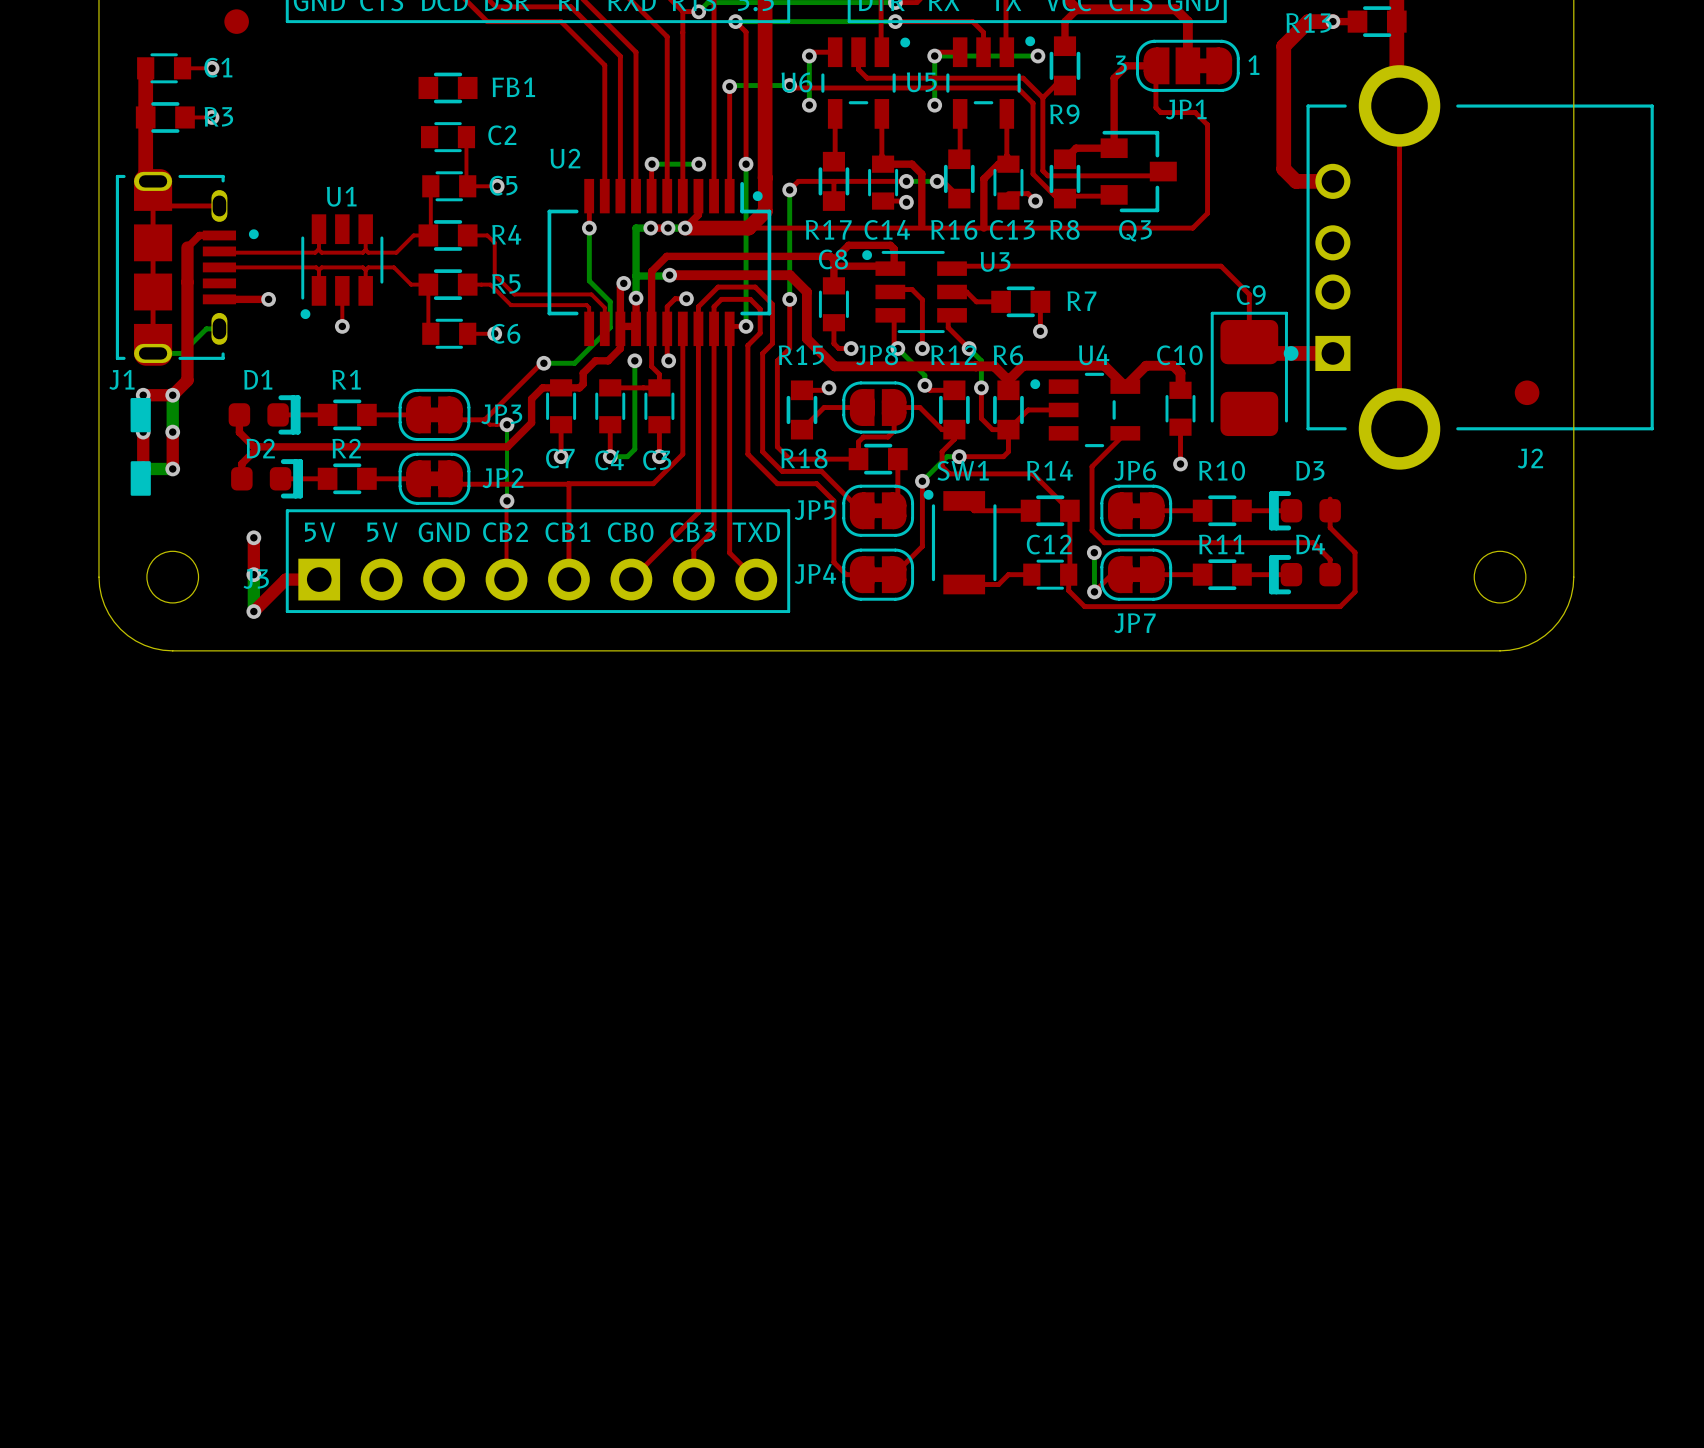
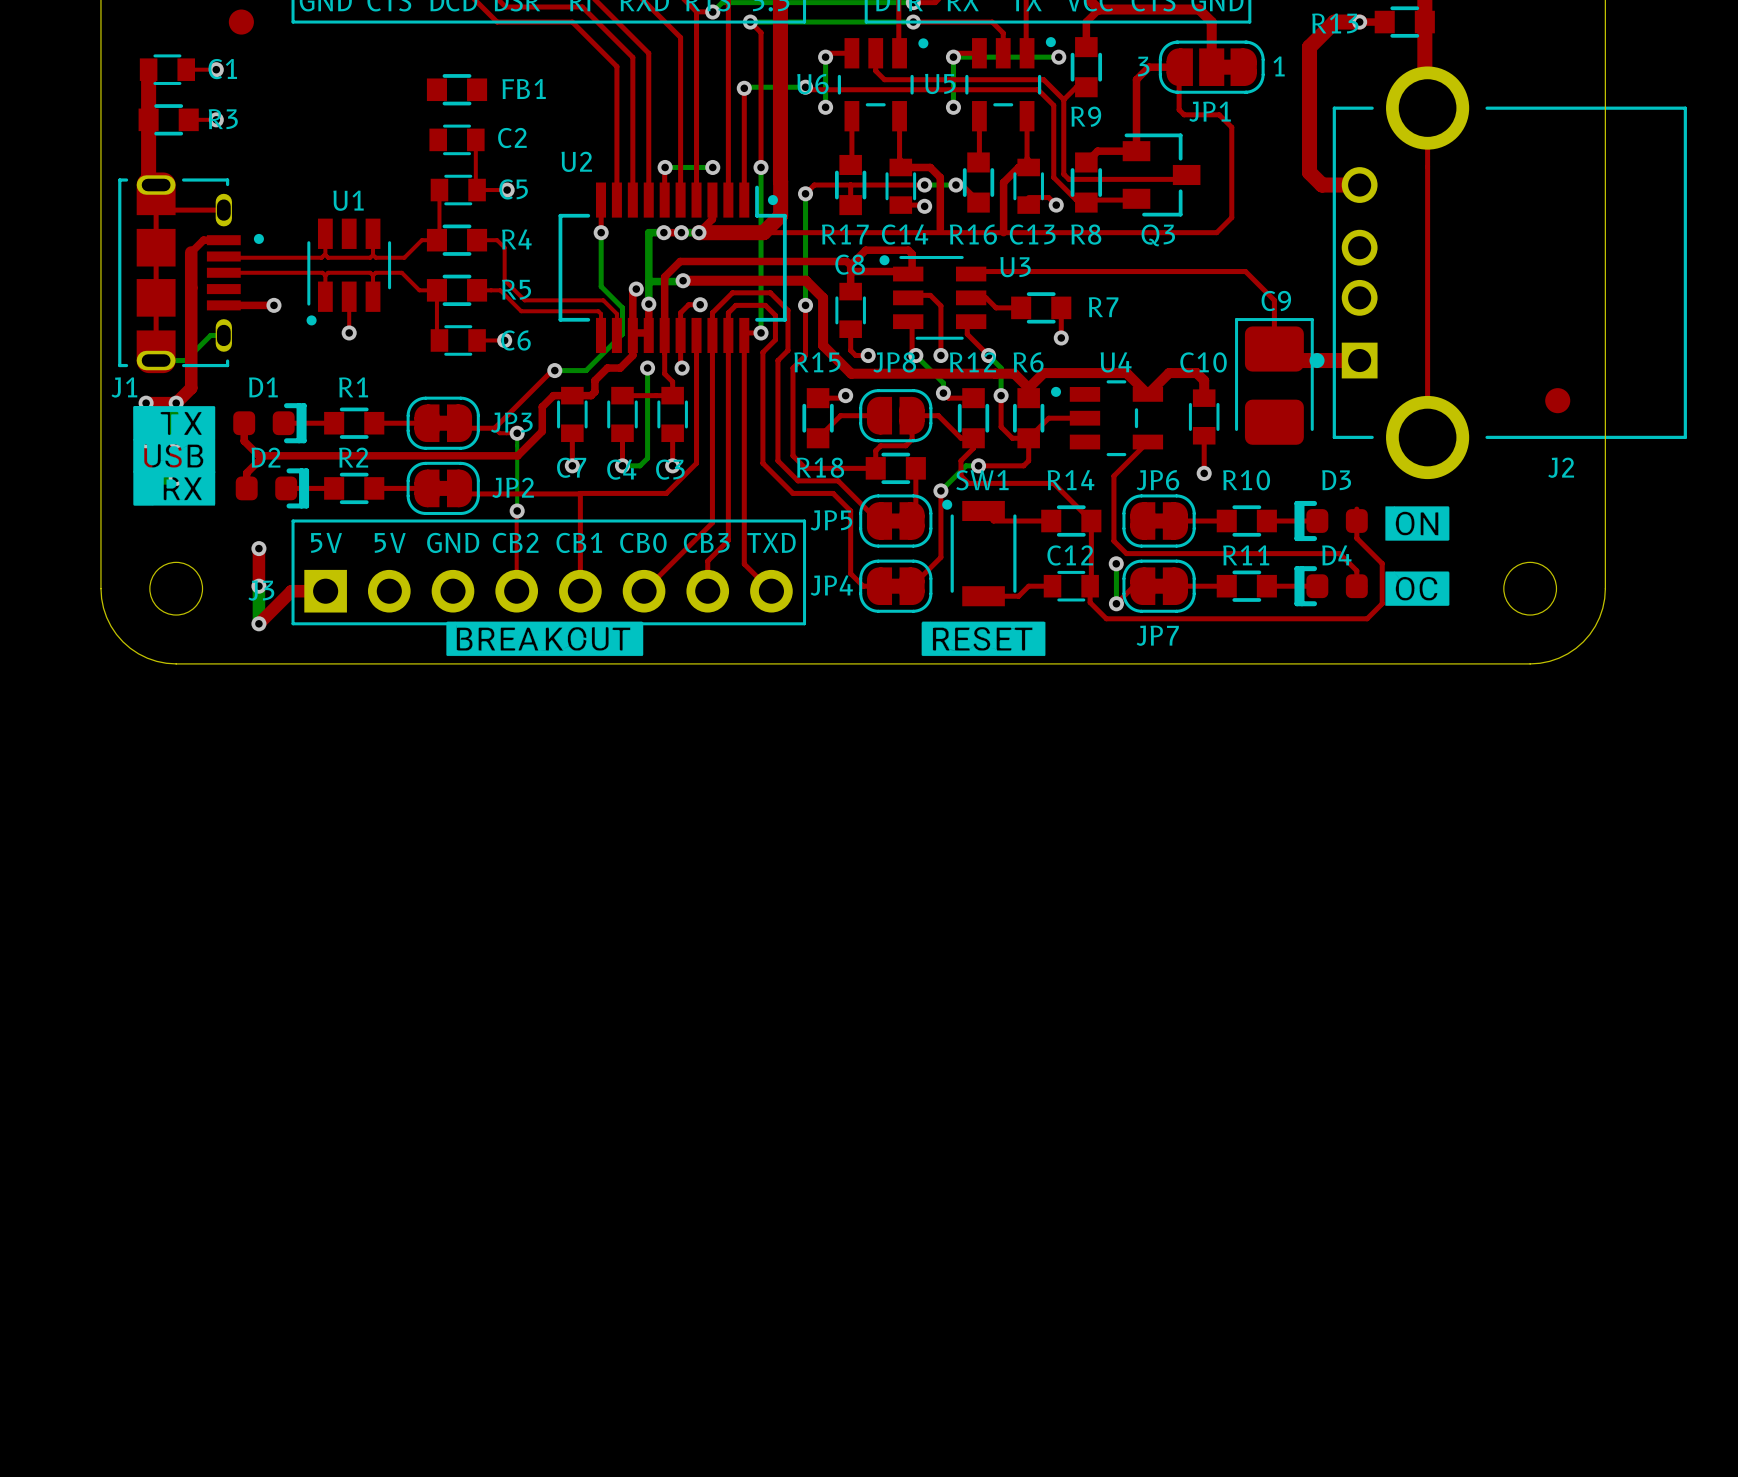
drawing: none -> [133, 406, 216, 506]
drawing: none -> [1385, 506, 1450, 541]
drawing: none -> [1385, 571, 1450, 606]
drawing: none -> [446, 621, 644, 657]
drawing: none -> [921, 621, 1046, 657]

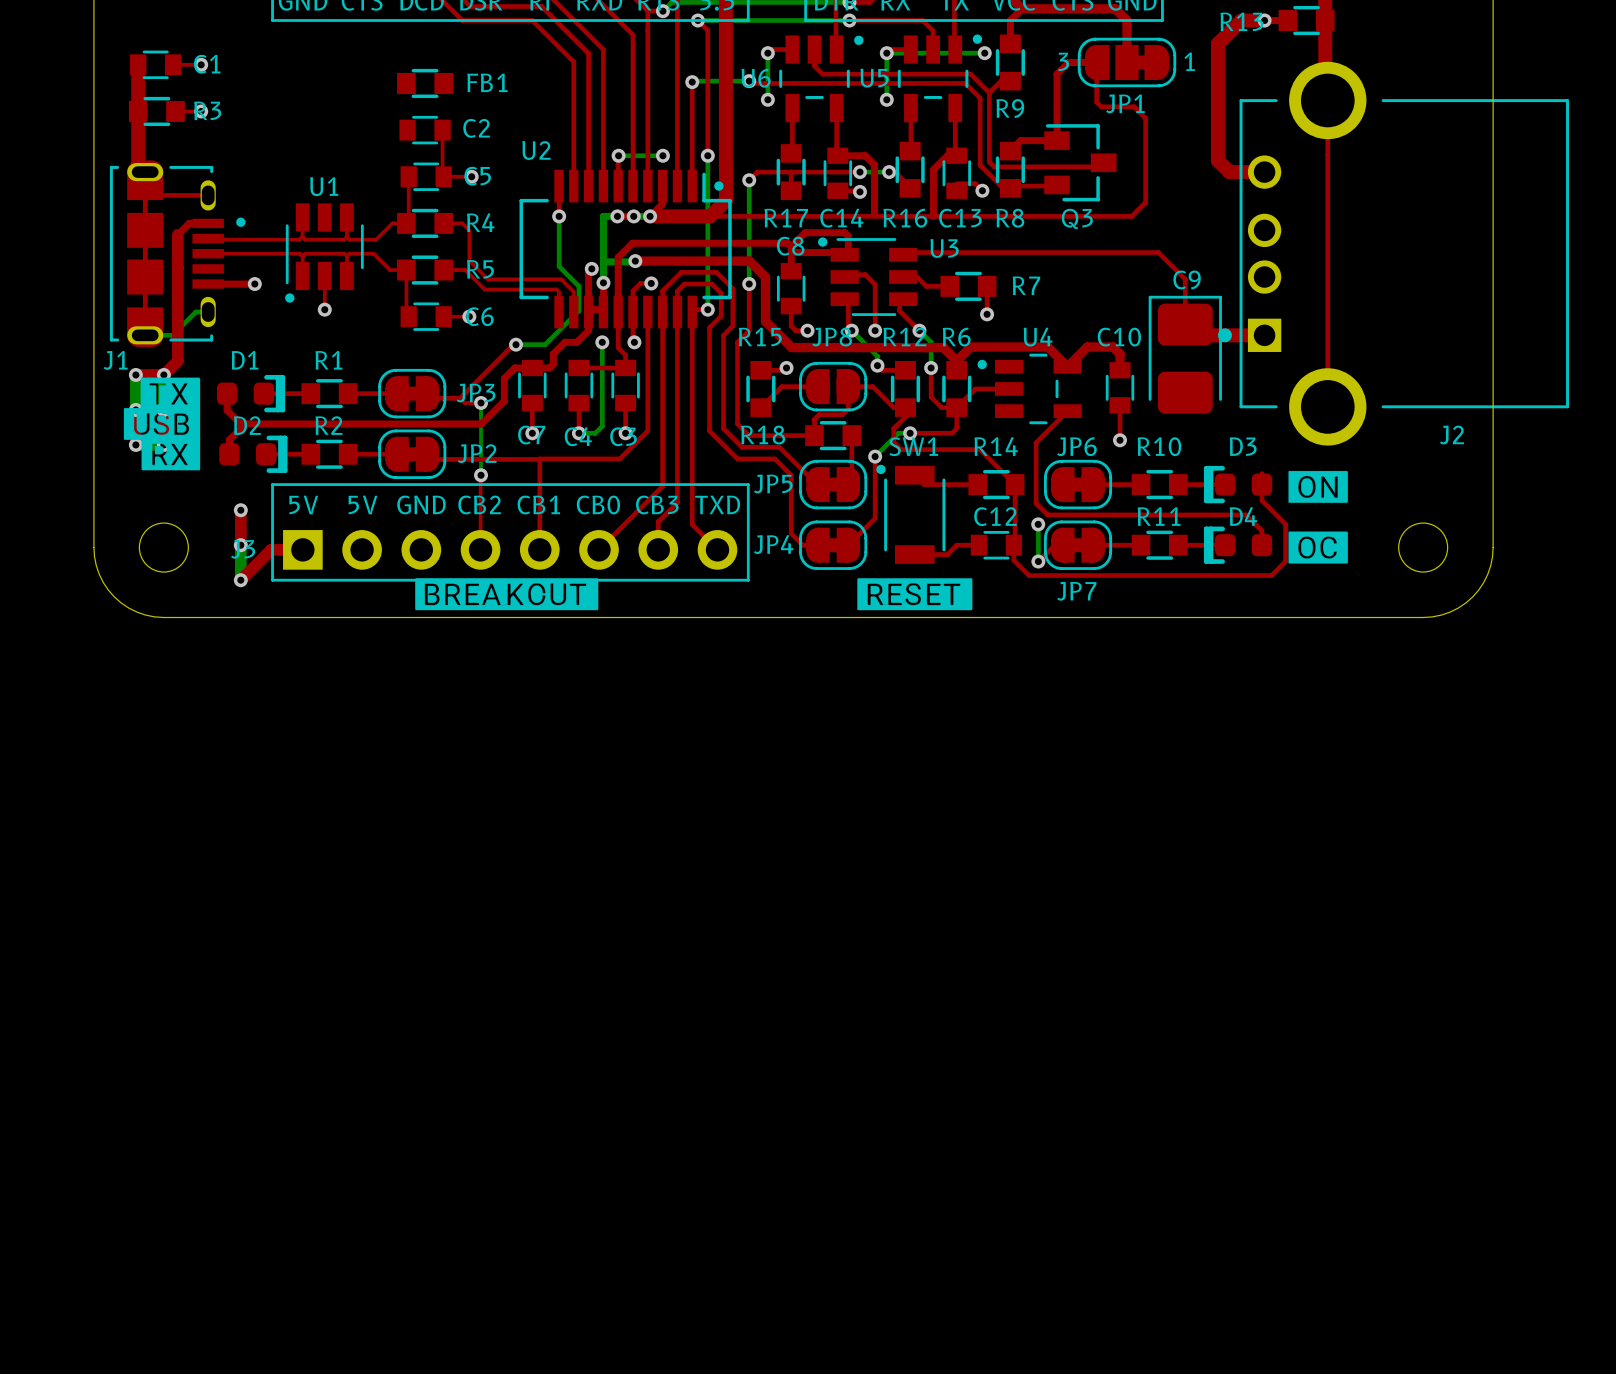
part: (241, 22) -> none
part: (1557, 400) -> none
drawing: [133, 405, 154, 506] -> none

